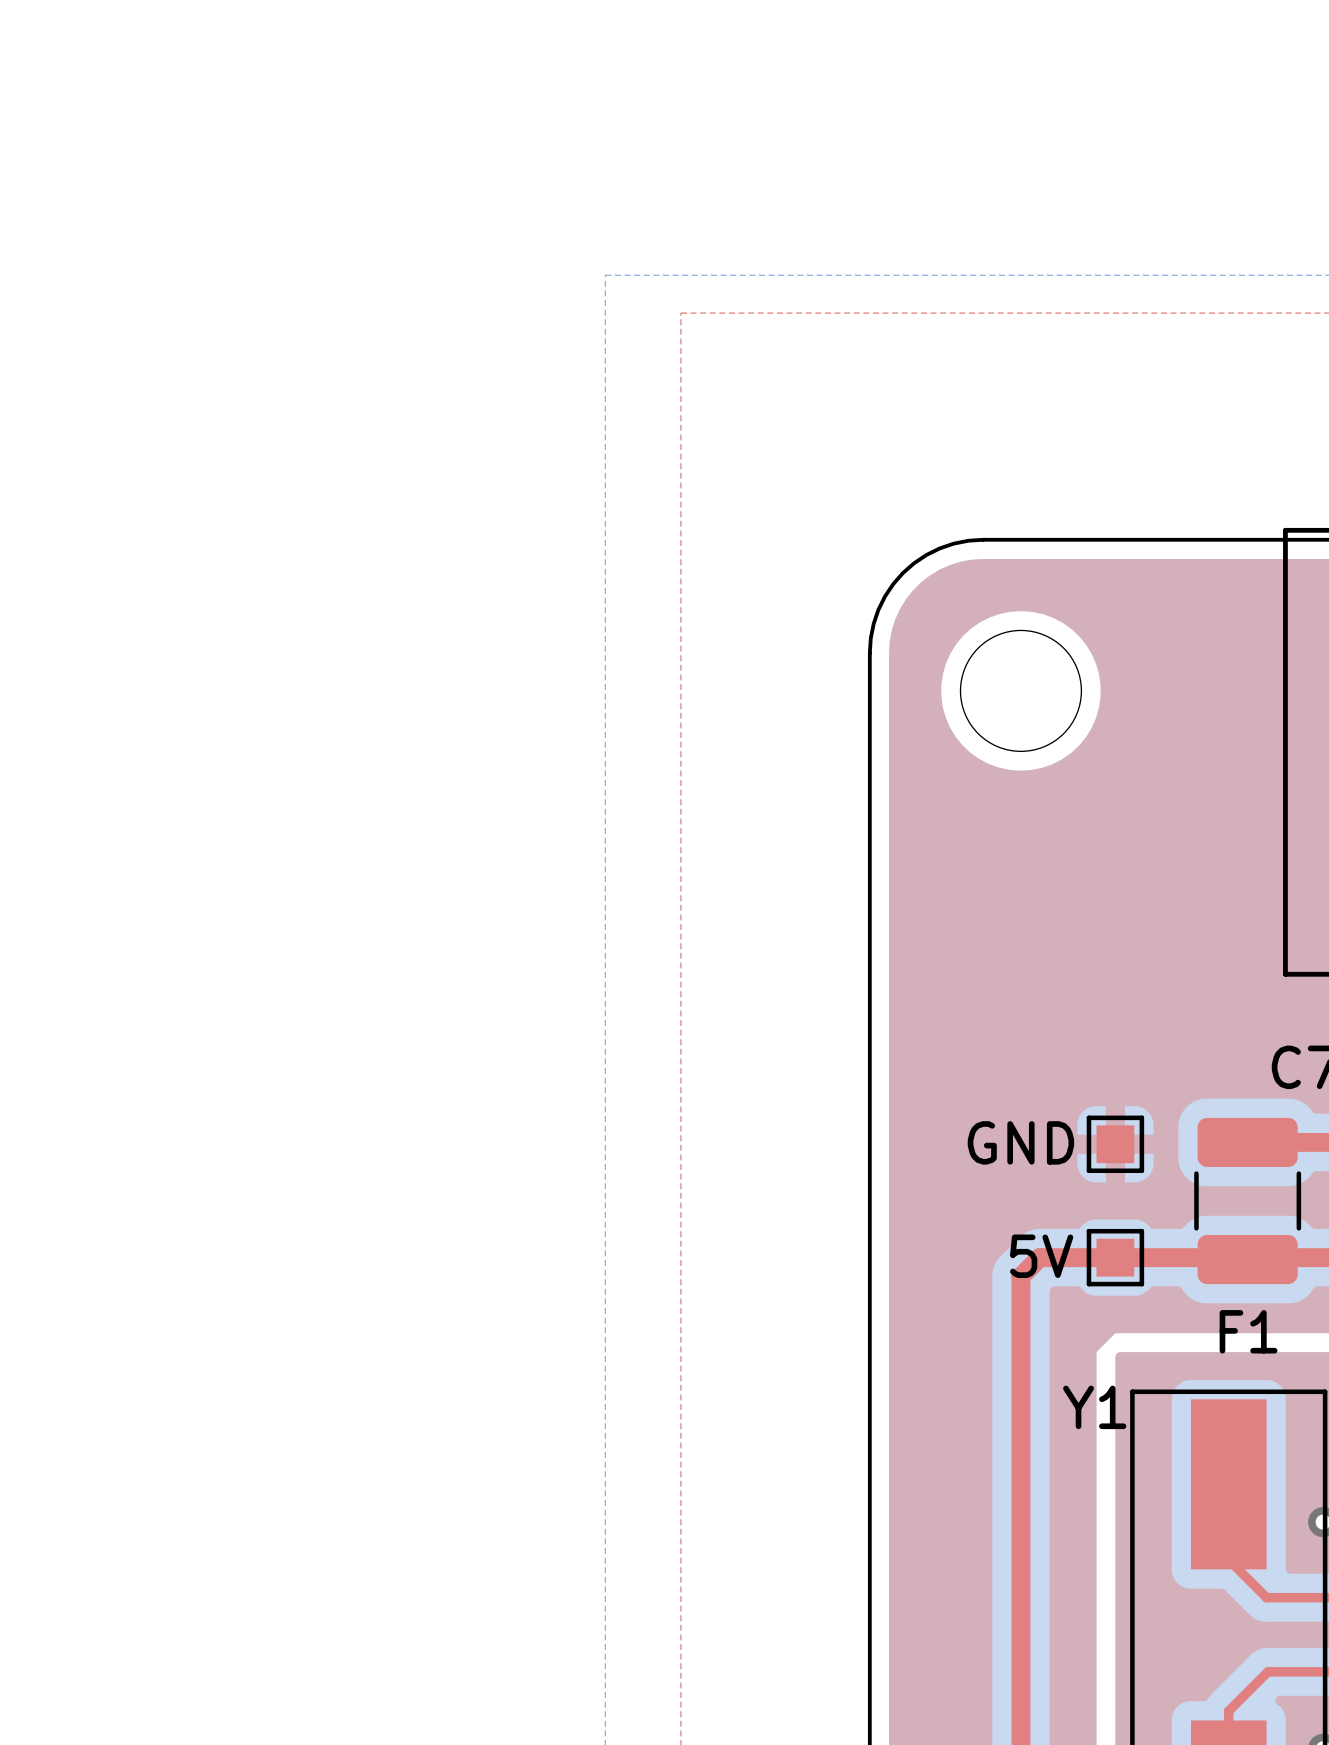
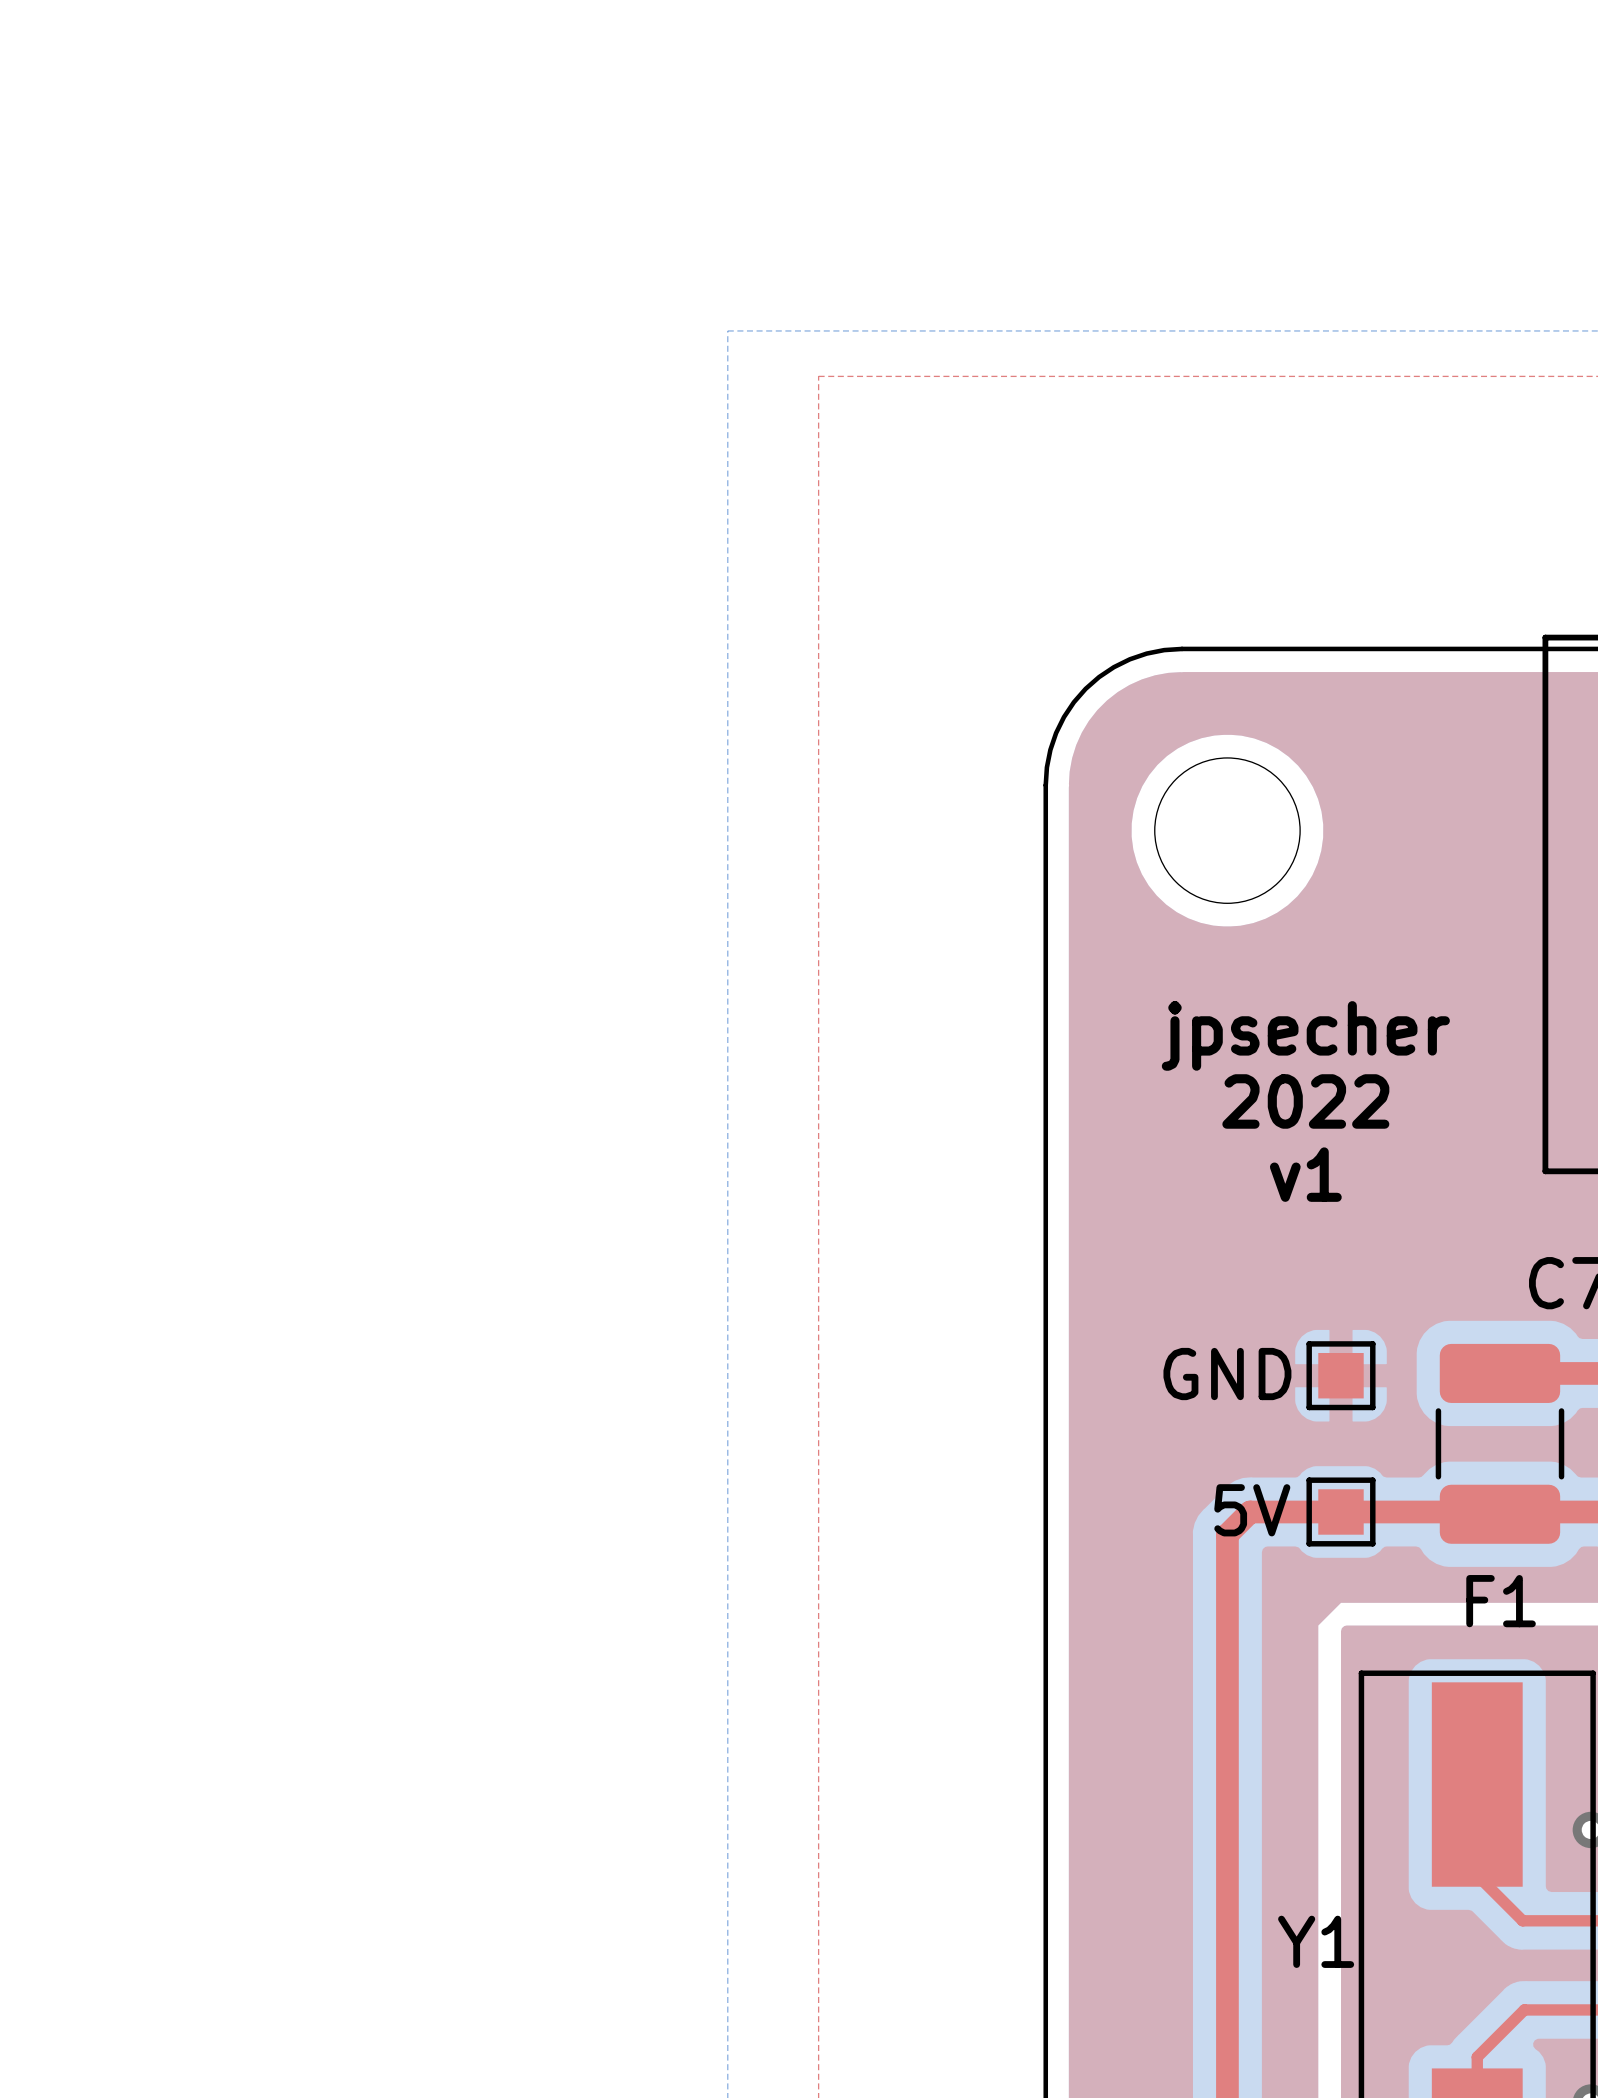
text: none -> jpsecher (1305, 1035)
text: none -> 2022 (1305, 1101)
text: none -> v1 (1305, 1174)
Y1 name position: Y1 (1094, 1407) -> Y1 (1316, 1941)

